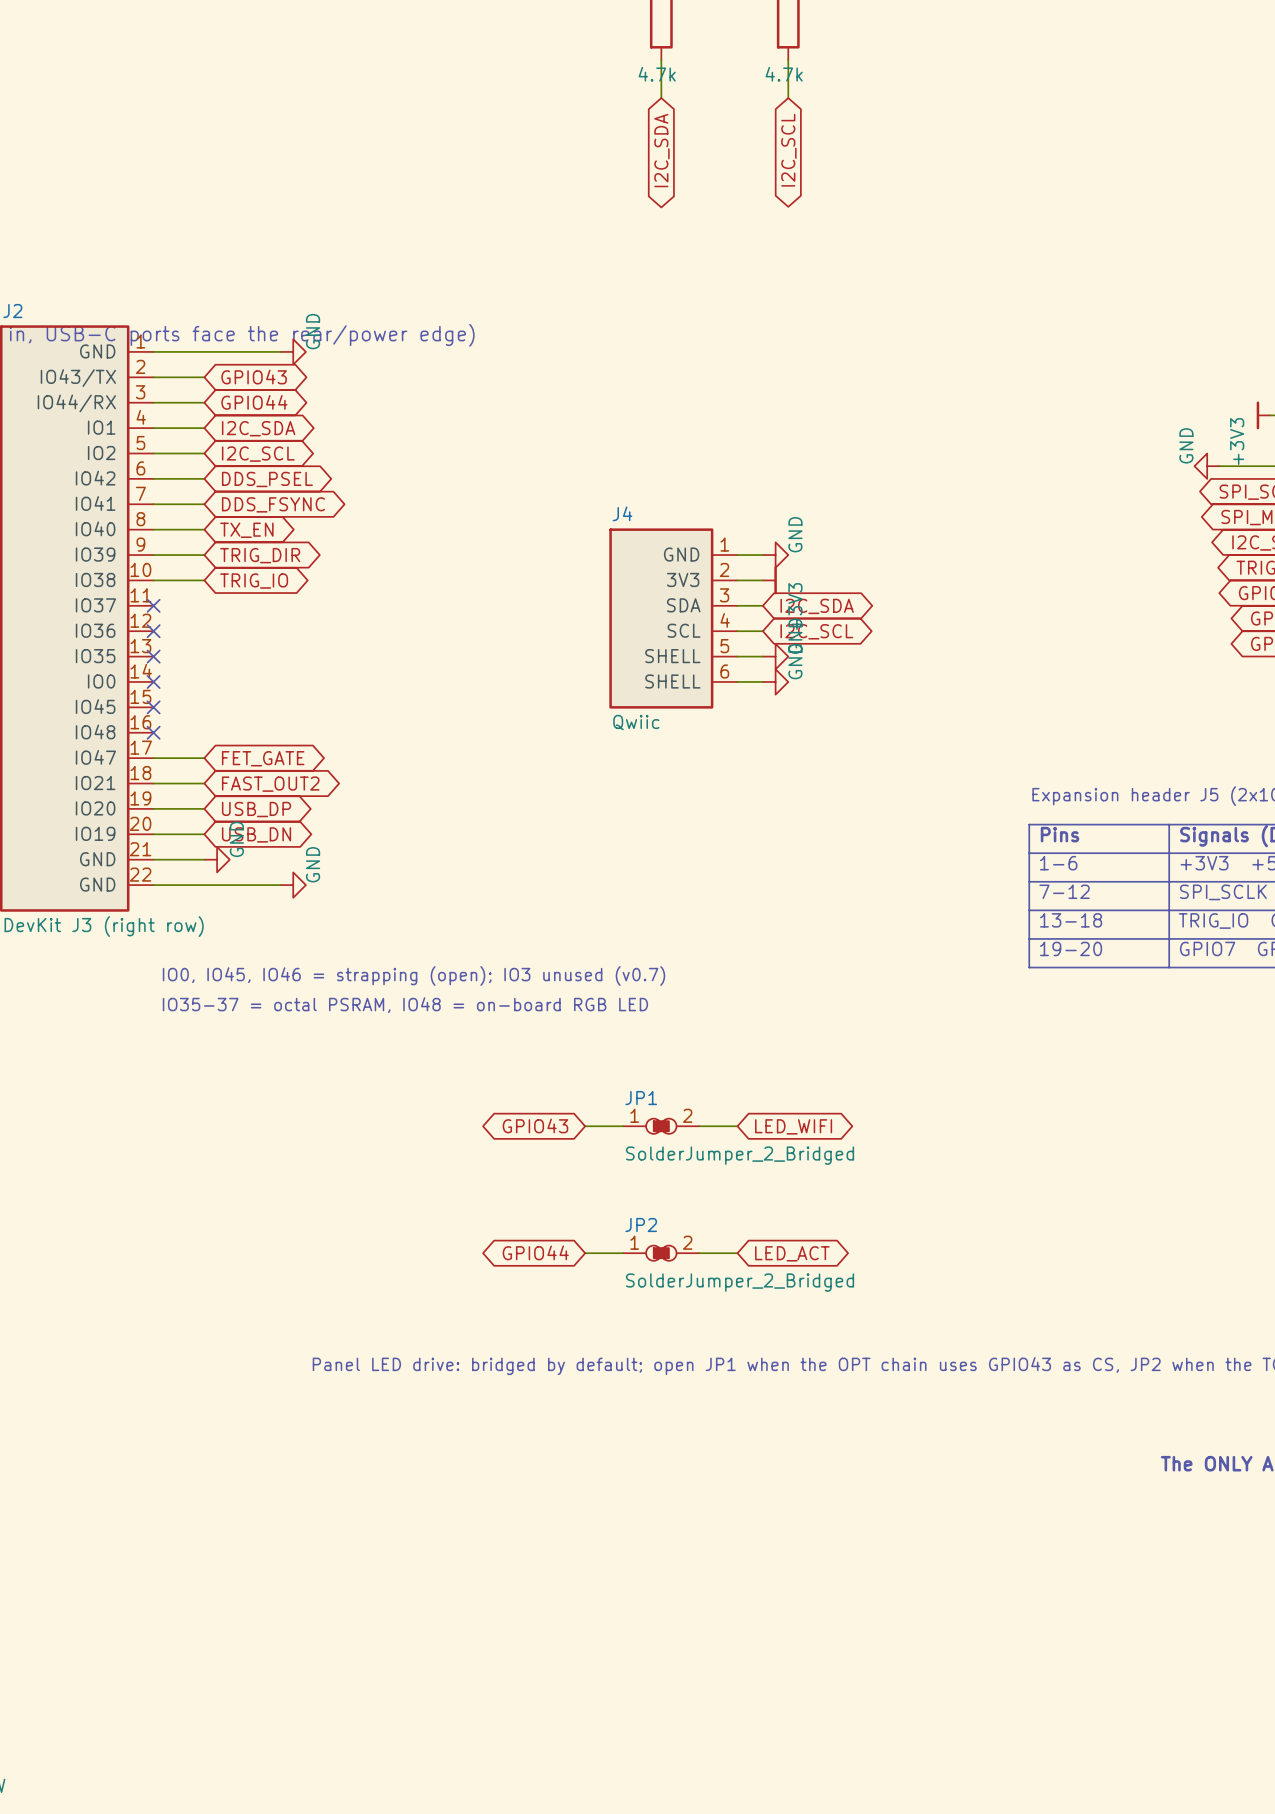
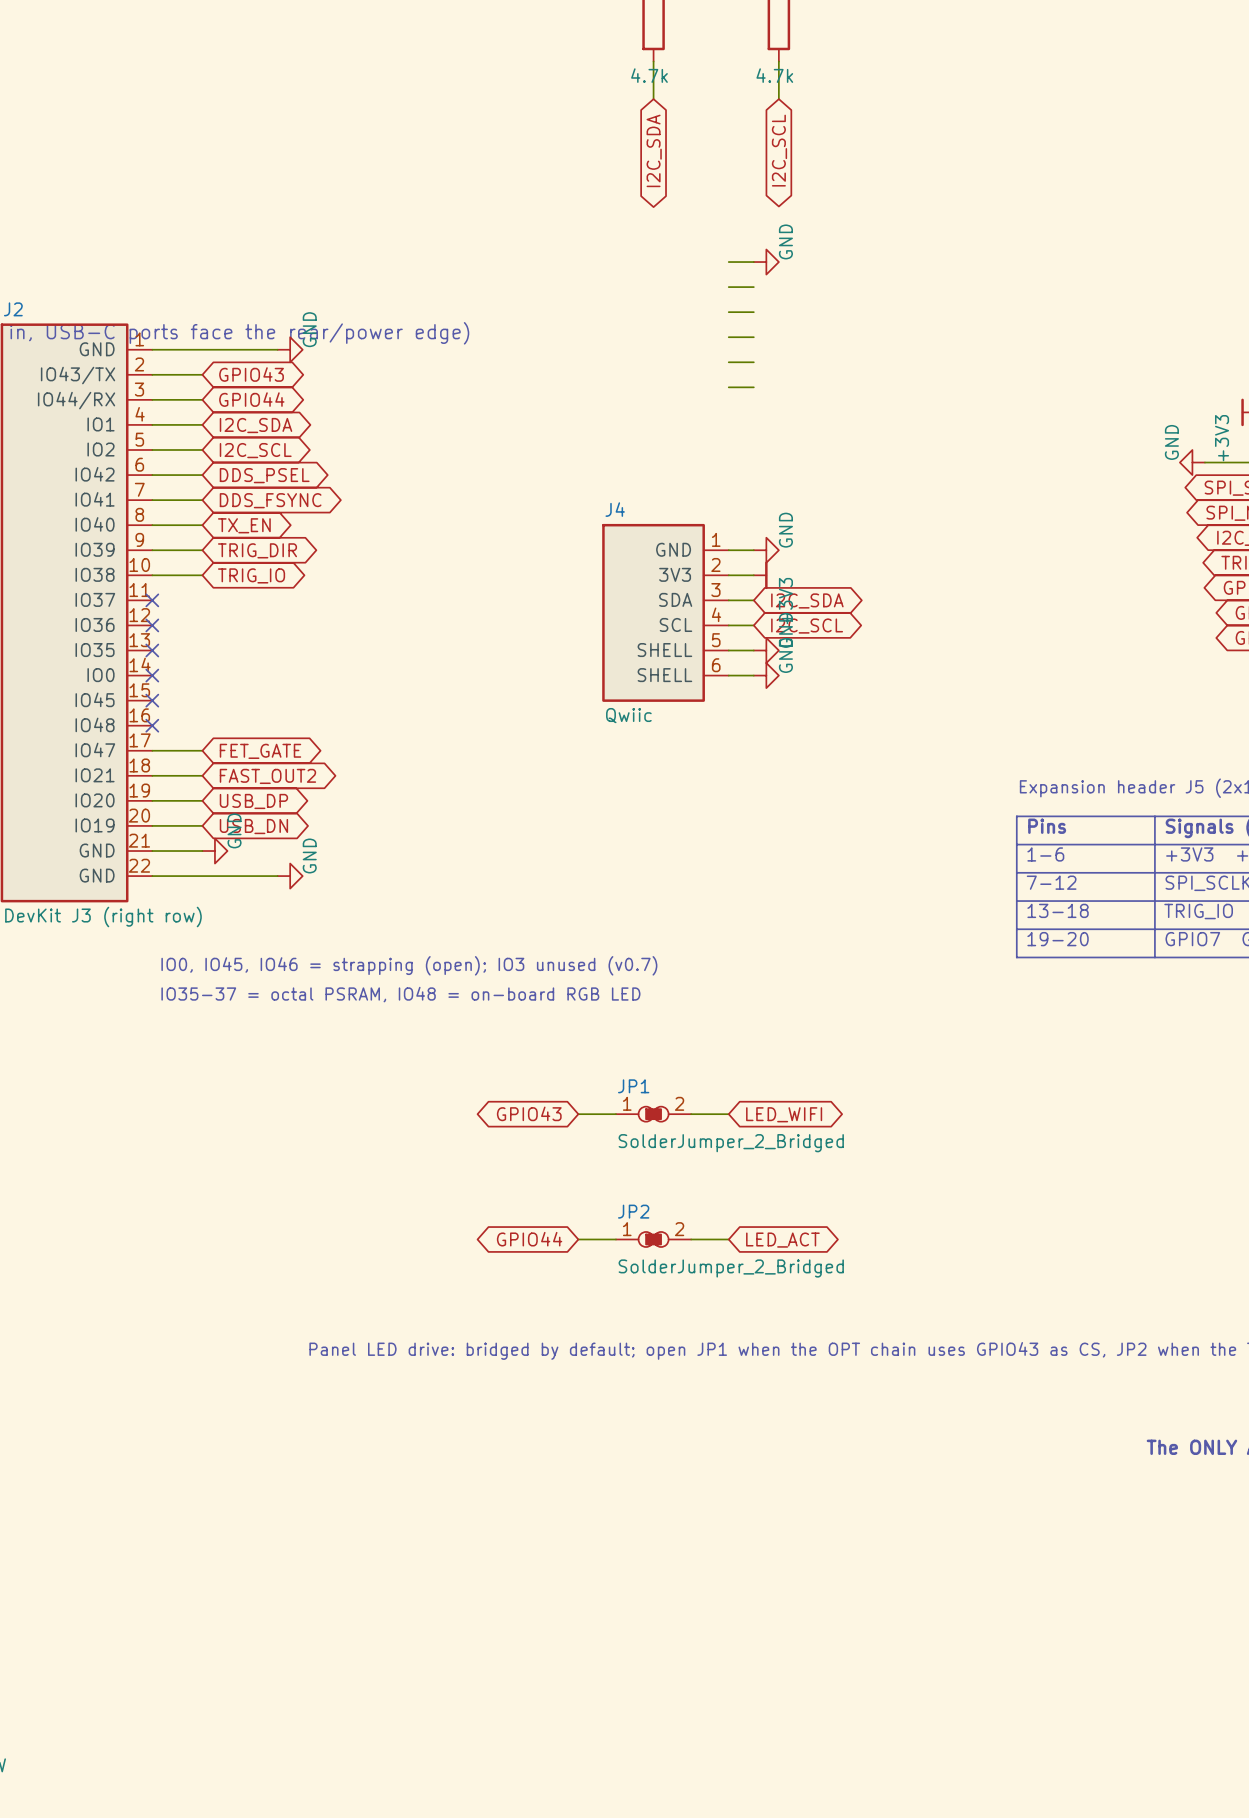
wire: none -> (728, 262) (753, 262)
power symbol: none -> GND (766, 262)
wire: none -> (728, 287) (753, 287)
wire: none -> (728, 312) (753, 312)
wire: none -> (728, 337) (753, 337)
wire: none -> (728, 362) (753, 362)
wire: none -> (728, 387) (753, 387)

